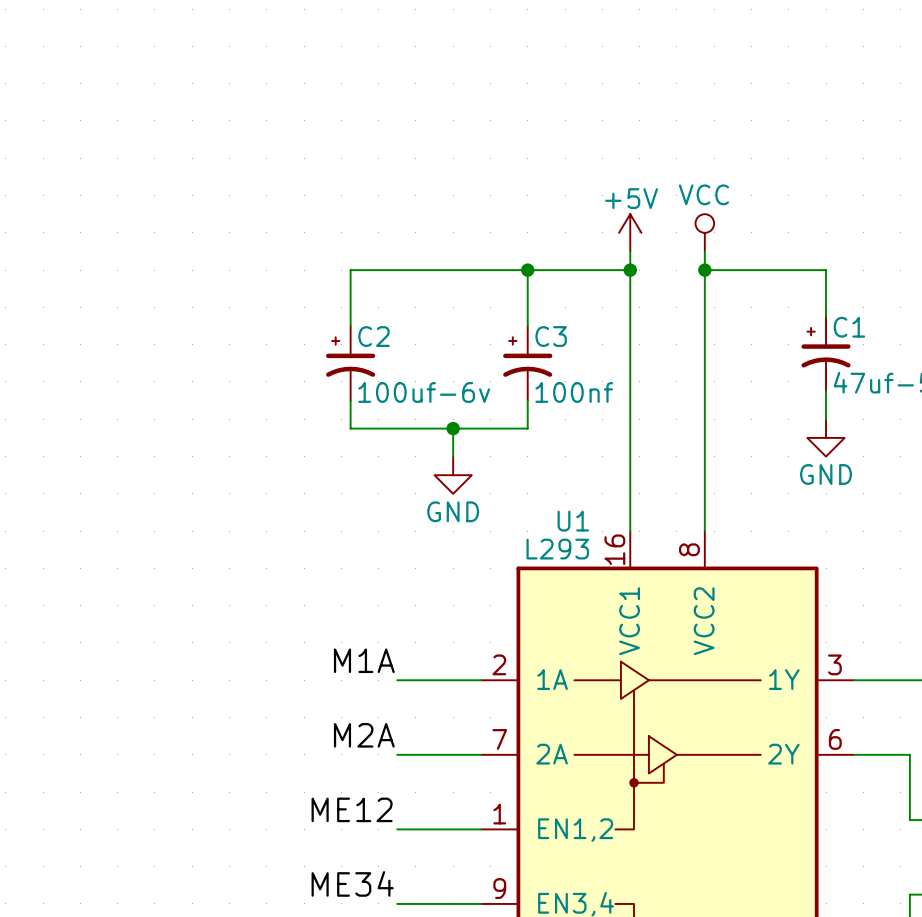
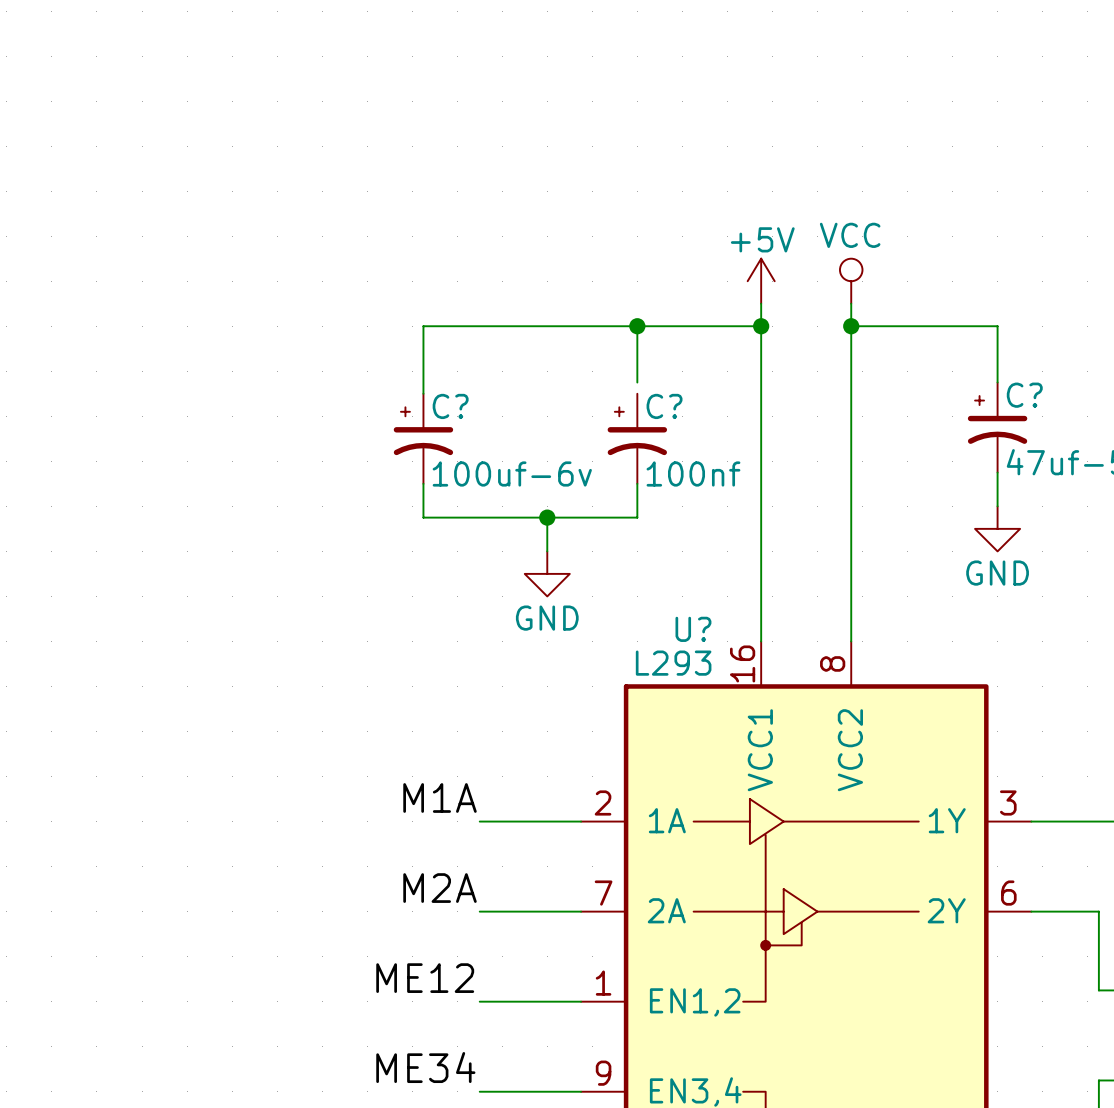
wire: (527, 316) (527, 326) -> none
C1 name: C1 (849, 327) -> C? (1024, 395)
C2 name: C2 (374, 336) -> C? (450, 406)
C3 name: C3 (551, 336) -> C? (664, 406)
U1 name: U1 (573, 521) -> U? (693, 629)

